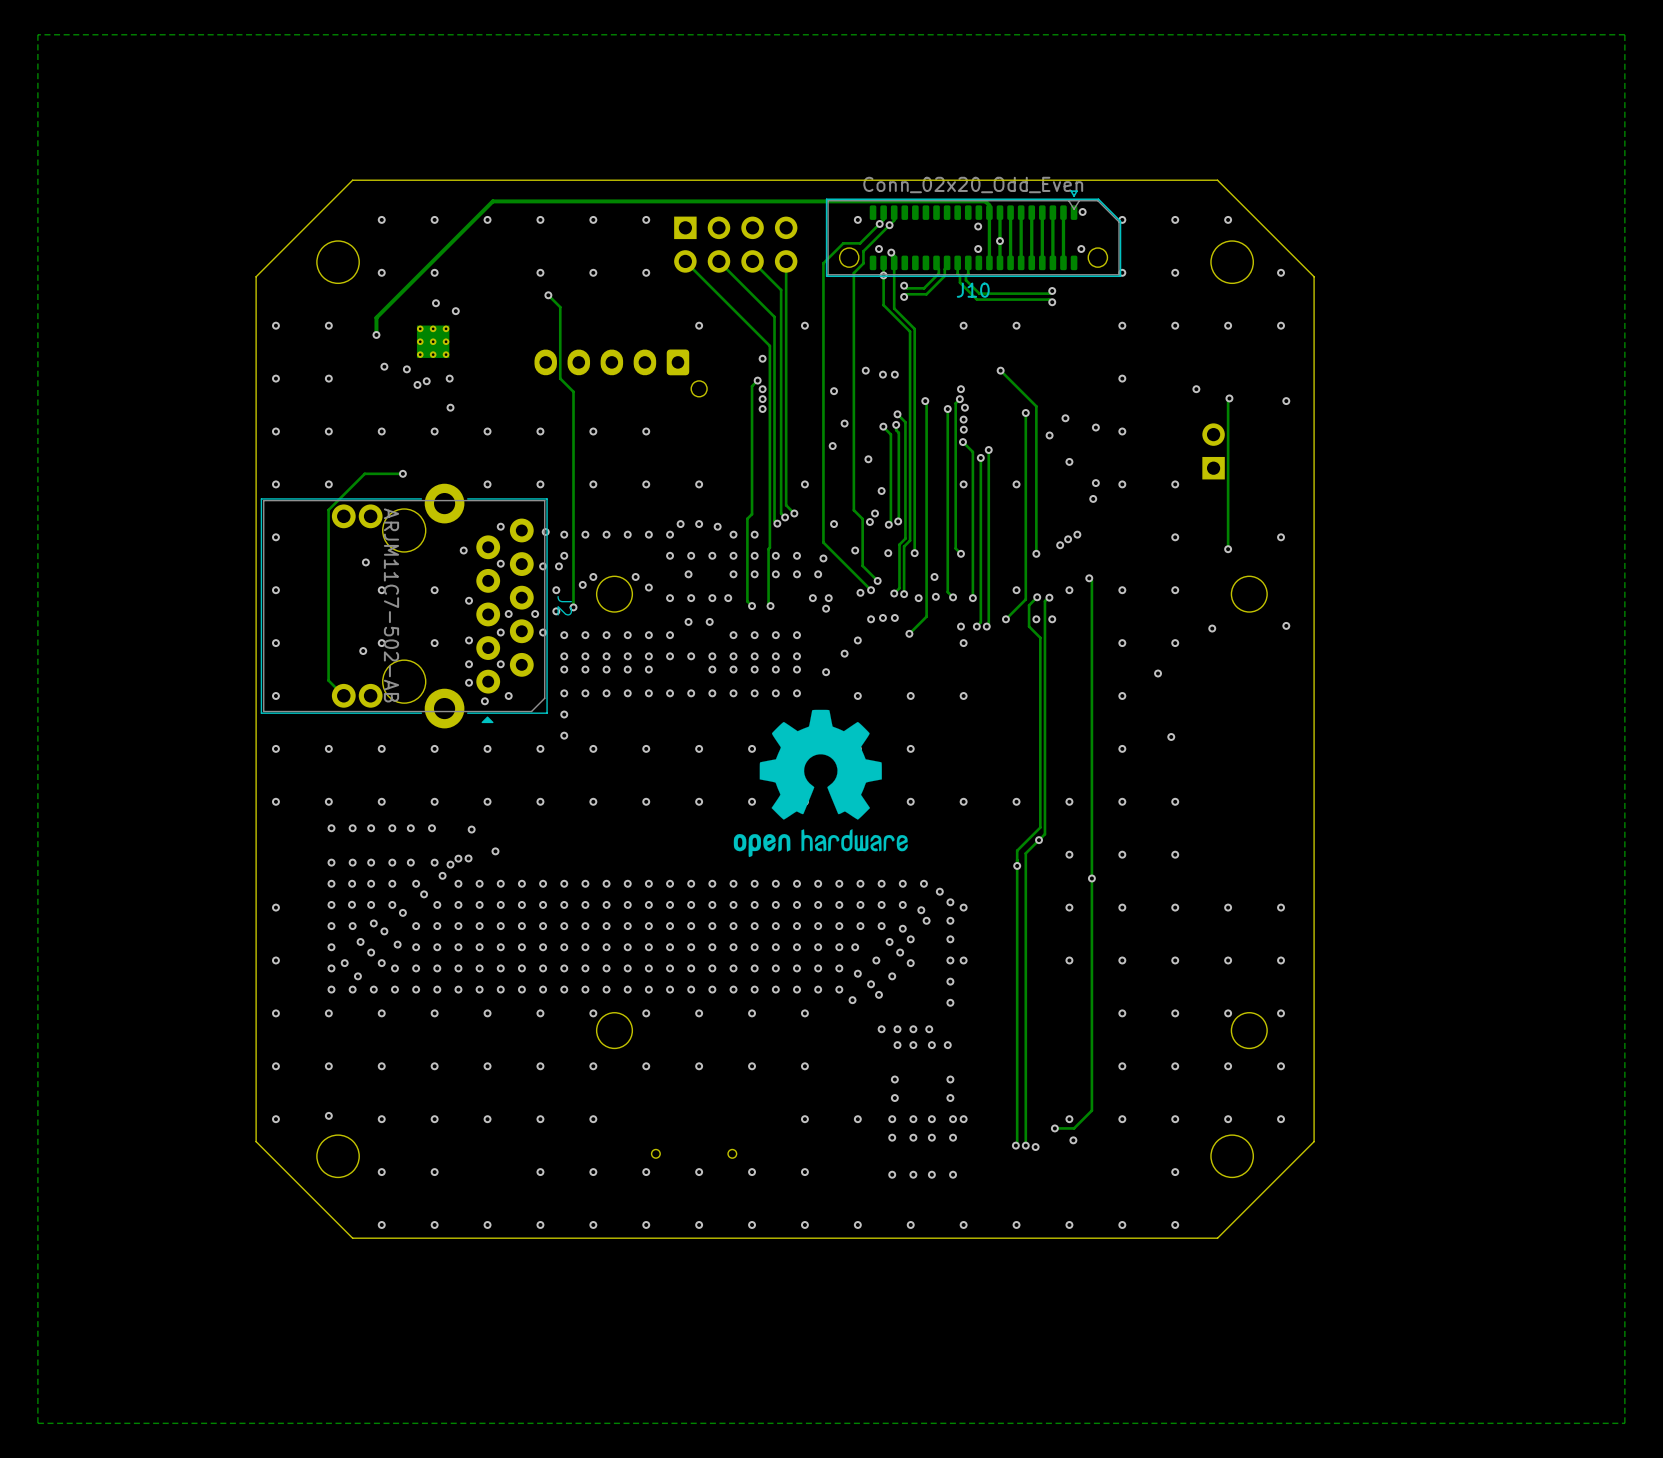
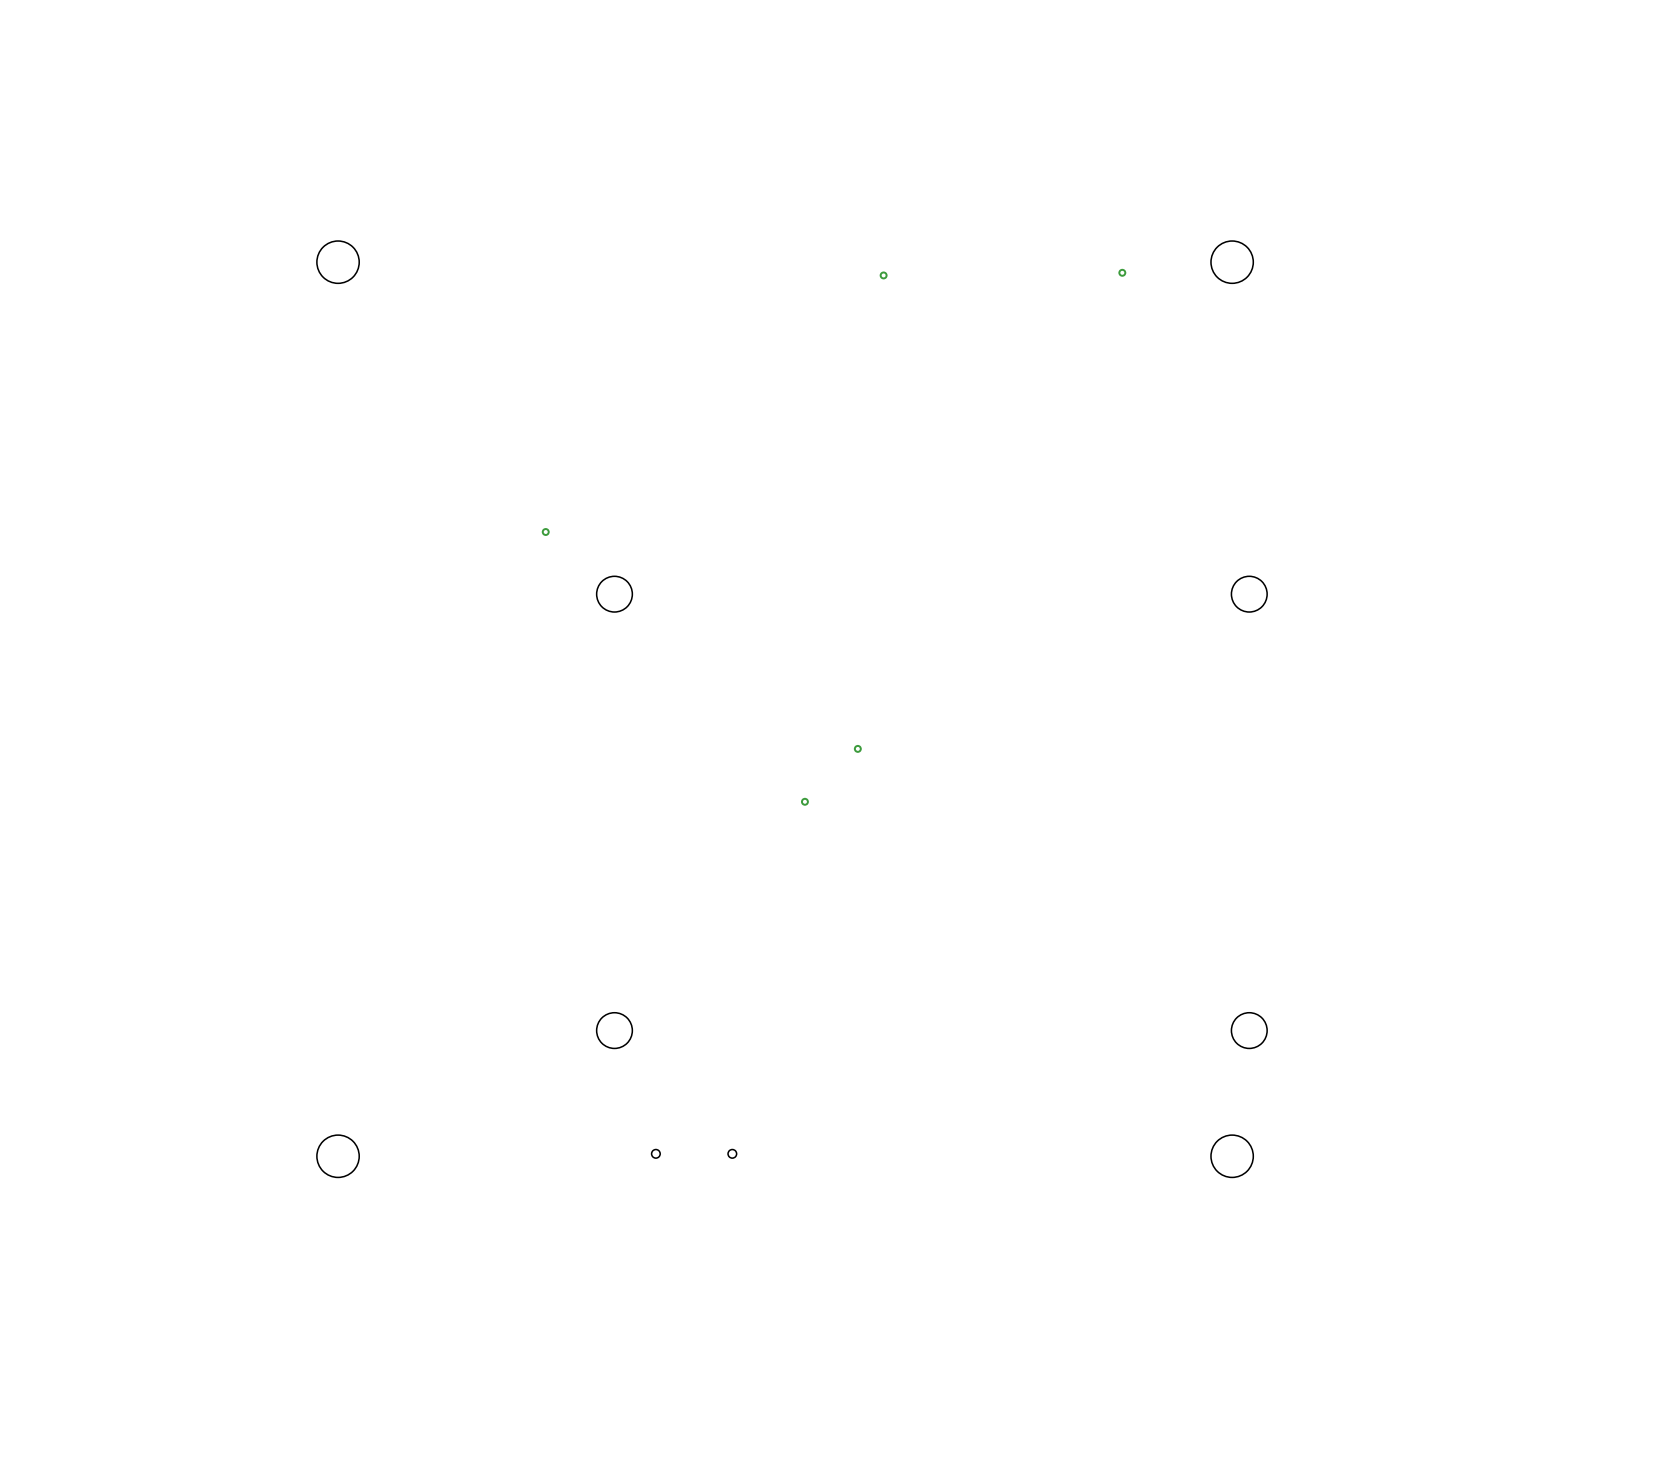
zone outline: (1624, 34) (37, 34) (37, 1423) (1624, 1423) (1624, 34) -> none
board edge: (1217, 180) (1314, 276) (1314, 1141) (1217, 1238) (352, 1238) (256, 1141) (256, 276) (352, 180) (1217, 180) -> none
via: (1082, 211) -> none
track: (883, 212) (883, 219) (860, 243) (843, 243) (823, 263) (823, 542) (871, 590) -> none
track: (894, 212) (894, 220) (863, 251) (863, 263) (853, 273) (853, 510) (862, 518) (862, 565) (877, 580) -> none
track: (999, 212) (999, 262) -> none
track: (1010, 212) (1010, 262) -> none
track: (1021, 212) (1021, 262) -> none
track: (1031, 212) (1031, 262) -> none
track: (1042, 212) (1042, 262) -> none
track: (1052, 212) (1052, 262) -> none
track: (1063, 212) (1063, 262) -> none
via: (381, 219) -> none
via: (434, 219) -> none
via: (487, 219) -> none
via: (540, 219) -> none
via: (593, 219) -> none
via: (646, 219) -> none
via: (857, 219) -> none
via: (1122, 219) -> none
via: (1175, 219) -> none
via: (1228, 219) -> none
via: (879, 223) -> none
via: (889, 225) -> none
via: (978, 226) -> none
J10: Conn_02x20_Odd_Even (973, 233) -> none
via: (999, 241) -> none
part: (735, 244) -> none
via: (878, 249) -> none
via: (978, 249) -> none
via: (1081, 249) -> none
track: (891, 252) (894, 255) (894, 308) (914, 329) (914, 553) -> none
via: (891, 252) -> none
track: (685, 261) (769, 345) (768, 604) (770, 606) -> none
track: (718, 261) (774, 316) (774, 520) (777, 523) -> none
track: (752, 261) (781, 289) (781, 513) (785, 517) -> none
track: (786, 261) (786, 505) (794, 513) -> none
track: (883, 262) (883, 305) (910, 331) (910, 540) (904, 546) (904, 594) -> none
track: (936, 262) (938, 273) (924, 288) (906, 288) (904, 285) -> none
track: (947, 262) (944, 276) (926, 294) (906, 294) (904, 296) -> none
track: (957, 262) (959, 282) (976, 299) (1049, 299) (1052, 302) -> none
track: (968, 262) (965, 280) (979, 293) (1049, 293) (1052, 290) -> none
track: (989, 262) (989, 205) (985, 201) (492, 201) (376, 317) (376, 334) -> none
via: (381, 272) -> none
via: (434, 272) -> none
via: (540, 272) -> none
via: (593, 272) -> none
via: (646, 272) -> none
via: (1175, 272) -> none
via: (1281, 272) -> none
via: (904, 285) -> none
via: (1052, 290) -> none
track: (548, 295) (560, 307) (560, 378) (573, 391) (573, 607) -> none
via: (548, 295) -> none
via: (904, 296) -> none
via: (1052, 302) -> none
via: (435, 303) -> none
via: (455, 311) -> none
via: (275, 325) -> none
via: (328, 325) -> none
via: (699, 325) -> none
via: (804, 325) -> none
via: (963, 325) -> none
via: (1016, 325) -> none
via: (1122, 325) -> none
via: (1175, 325) -> none
via: (1228, 325) -> none
via: (1281, 325) -> none
via: (376, 334) -> none
part: (433, 341) -> none
via: (762, 358) -> none
via: (384, 366) -> none
via: (406, 369) -> none
via: (865, 370) -> none
track: (1000, 370) (1036, 406) (1036, 553) -> none
via: (1000, 370) -> none
part: (620, 373) -> none
via: (882, 374) -> none
via: (894, 374) -> none
via: (275, 378) -> none
via: (328, 378) -> none
via: (449, 378) -> none
via: (1122, 378) -> none
track: (757, 380) (752, 386) (752, 514) (747, 518) (747, 601) (752, 606) -> none
via: (757, 380) -> none
via: (426, 381) -> none
via: (417, 384) -> none
via: (762, 389) -> none
via: (960, 389) -> none
via: (1196, 389) -> none
via: (834, 391) -> none
track: (1229, 398) (1228, 549) -> none
via: (1229, 398) -> none
via: (762, 399) -> none
track: (959, 399) (955, 403) (955, 548) (960, 553) -> none
via: (959, 399) -> none
track: (925, 401) (926, 616) (909, 633) -> none
via: (925, 401) -> none
via: (1286, 401) -> none
via: (450, 407) -> none
via: (964, 407) -> none
via: (762, 409) -> none
track: (947, 409) (947, 592) (953, 597) -> none
via: (947, 409) -> none
track: (1025, 412) (1025, 599) (1005, 619) -> none
via: (1025, 412) -> none
track: (897, 414) (905, 422) (905, 538) (899, 544) (899, 588) (894, 593) -> none
via: (897, 414) -> none
via: (1065, 418) -> none
via: (963, 419) -> none
via: (844, 423) -> none
track: (896, 424) (896, 430) (898, 432) (898, 521) -> none
via: (896, 424) -> none
track: (883, 426) (890, 434) (890, 522) (888, 524) -> none
via: (883, 426) -> none
via: (1095, 427) -> none
via: (963, 429) -> none
via: (275, 431) -> none
via: (328, 431) -> none
via: (381, 431) -> none
via: (434, 431) -> none
via: (487, 431) -> none
via: (540, 431) -> none
via: (593, 431) -> none
via: (646, 431) -> none
via: (1122, 431) -> none
via: (1049, 435) -> none
track: (962, 442) (972, 452) (972, 598) -> none
via: (962, 442) -> none
via: (832, 446) -> none
track: (988, 450) (988, 624) (986, 626) -> none
via: (988, 450) -> none
part: (1213, 451) -> none
track: (980, 457) (980, 622) (976, 626) -> none
via: (980, 457) -> none
via: (868, 459) -> none
via: (1069, 461) -> none
track: (402, 473) (364, 473) (328, 510) (328, 680) (343, 695) -> none
via: (402, 473) -> none
via: (1095, 483) -> none
via: (275, 484) -> none
via: (328, 484) -> none
via: (487, 484) -> none
via: (540, 484) -> none
via: (593, 484) -> none
via: (646, 484) -> none
via: (699, 484) -> none
via: (804, 484) -> none
via: (963, 484) -> none
via: (1016, 484) -> none
via: (1122, 484) -> none
via: (1175, 484) -> none
via: (881, 491) -> none
via: (1093, 498) -> none
via: (794, 513) -> none
via: (875, 513) -> none
via: (785, 517) -> none
via: (898, 521) -> none
via: (869, 522) -> none
via: (777, 523) -> none
via: (680, 524) -> none
via: (699, 524) -> none
via: (834, 524) -> none
via: (888, 524) -> none
via: (500, 526) -> none
via: (717, 526) -> none
via: (564, 534) -> none
via: (585, 534) -> none
via: (606, 534) -> none
via: (627, 534) -> none
via: (648, 534) -> none
via: (670, 534) -> none
via: (733, 534) -> none
via: (754, 534) -> none
via: (1077, 534) -> none
via: (275, 537) -> none
via: (1175, 537) -> none
via: (1281, 537) -> none
via: (1068, 539) -> none
via: (1060, 545) -> none
via: (1228, 549) -> none
via: (463, 550) -> none
via: (855, 550) -> none
via: (888, 553) -> none
via: (914, 553) -> none
via: (960, 553) -> none
via: (1036, 553) -> none
via: (564, 555) -> none
via: (670, 555) -> none
via: (691, 555) -> none
via: (712, 555) -> none
via: (733, 555) -> none
via: (754, 555) -> none
via: (775, 555) -> none
via: (797, 555) -> none
via: (823, 558) -> none
via: (365, 562) -> none
via: (500, 563) -> none
via: (543, 566) -> none
via: (558, 566) -> none
via: (688, 574) -> none
via: (733, 574) -> none
via: (754, 574) -> none
via: (775, 574) -> none
via: (797, 574) -> none
via: (818, 574) -> none
via: (593, 576) -> none
via: (635, 576) -> none
via: (934, 576) -> none
track: (1089, 578) (1091, 580) (1091, 1110) (1074, 1128) (1054, 1128) -> none
via: (1089, 578) -> none
via: (877, 580) -> none
via: (582, 584) -> none
via: (648, 587) -> none
via: (275, 590) -> none
via: (381, 590) -> none
via: (434, 590) -> none
via: (556, 590) -> none
via: (871, 590) -> none
via: (1016, 590) -> none
via: (1069, 590) -> none
via: (1122, 590) -> none
via: (1175, 590) -> none
via: (860, 592) -> none
via: (894, 593) -> none
via: (904, 594) -> none
via: (935, 596) -> none
via: (953, 597) -> none
track: (1037, 597) (1029, 605) (1029, 626) (1040, 637) (1040, 827) (1017, 850) (1015, 1145) -> none
via: (1037, 597) -> none
track: (1049, 597) (1044, 601) (1044, 834) (1025, 853) (1025, 1145) -> none
via: (1049, 597) -> none
via: (670, 598) -> none
via: (691, 598) -> none
via: (712, 598) -> none
via: (728, 598) -> none
via: (812, 598) -> none
via: (828, 598) -> none
via: (918, 598) -> none
via: (972, 598) -> none
via: (469, 600) -> none
J2: ARJM11C7-502-AB (404, 606) -> none
via: (752, 606) -> none
via: (770, 606) -> none
via: (573, 607) -> none
via: (826, 608) -> none
via: (556, 611) -> none
via: (508, 614) -> none
via: (535, 614) -> none
via: (882, 617) -> none
via: (894, 617) -> none
via: (871, 619) -> none
via: (1005, 619) -> none
via: (1036, 619) -> none
via: (1052, 619) -> none
via: (688, 621) -> none
via: (709, 621) -> none
via: (1286, 625) -> none
via: (960, 626) -> none
via: (976, 626) -> none
via: (986, 626) -> none
via: (1212, 628) -> none
via: (500, 632) -> none
via: (543, 632) -> none
via: (909, 633) -> none
via: (564, 635) -> none
via: (585, 635) -> none
via: (606, 635) -> none
via: (627, 635) -> none
via: (648, 635) -> none
via: (670, 635) -> none
via: (733, 635) -> none
via: (754, 635) -> none
via: (775, 635) -> none
via: (797, 635) -> none
via: (469, 640) -> none
via: (857, 640) -> none
via: (275, 643) -> none
via: (381, 643) -> none
via: (434, 643) -> none
via: (963, 643) -> none
via: (1122, 643) -> none
via: (1175, 643) -> none
via: (363, 651) -> none
via: (844, 653) -> none
via: (564, 656) -> none
via: (585, 656) -> none
via: (606, 656) -> none
via: (627, 656) -> none
via: (648, 656) -> none
via: (670, 656) -> none
via: (691, 656) -> none
via: (712, 656) -> none
via: (733, 656) -> none
via: (754, 656) -> none
via: (775, 656) -> none
via: (797, 656) -> none
via: (469, 664) -> none
via: (500, 664) -> none
via: (564, 669) -> none
via: (585, 669) -> none
via: (606, 669) -> none
via: (627, 669) -> none
via: (648, 669) -> none
via: (712, 669) -> none
via: (733, 669) -> none
via: (754, 669) -> none
via: (775, 669) -> none
via: (797, 669) -> none
via: (826, 672) -> none
via: (1158, 673) -> none
via: (469, 682) -> none
via: (564, 693) -> none
via: (585, 693) -> none
via: (606, 693) -> none
via: (627, 693) -> none
via: (648, 693) -> none
via: (670, 693) -> none
via: (691, 693) -> none
via: (712, 693) -> none
via: (733, 693) -> none
via: (754, 693) -> none
via: (775, 693) -> none
via: (797, 693) -> none
via: (275, 695) -> none
via: (508, 695) -> none
via: (857, 695) -> none
via: (910, 695) -> none
via: (963, 695) -> none
via: (1122, 695) -> none
via: (484, 701) -> none
drawing: [733, 709, 908, 858] -> none
via: (564, 714) -> none
via: (564, 735) -> none
via: (1171, 736) -> none
via: (275, 748) -> none
via: (328, 748) -> none
via: (381, 748) -> none
via: (434, 748) -> none
via: (487, 748) -> none
via: (540, 748) -> none
via: (593, 748) -> none
via: (646, 748) -> none
via: (699, 748) -> none
via: (752, 748) -> none
via: (910, 748) -> none
via: (1122, 748) -> none
via: (275, 801) -> none
via: (328, 801) -> none
via: (381, 801) -> none
via: (434, 801) -> none
via: (487, 801) -> none
via: (540, 801) -> none
via: (593, 801) -> none
via: (646, 801) -> none
via: (699, 801) -> none
via: (752, 801) -> none
via: (910, 801) -> none
via: (963, 801) -> none
via: (1016, 801) -> none
via: (1069, 801) -> none
via: (1122, 801) -> none
via: (1175, 801) -> none
via: (331, 828) -> none
via: (352, 828) -> none
via: (371, 828) -> none
via: (392, 828) -> none
via: (410, 828) -> none
via: (432, 828) -> none
via: (471, 829) -> none
via: (1039, 840) -> none
via: (495, 851) -> none
via: (1069, 854) -> none
via: (1122, 854) -> none
via: (1175, 854) -> none
via: (458, 858) -> none
via: (468, 858) -> none
via: (331, 862) -> none
via: (352, 862) -> none
via: (371, 862) -> none
via: (392, 862) -> none
via: (410, 862) -> none
via: (434, 862) -> none
via: (450, 864) -> none
via: (1017, 865) -> none
via: (442, 875) -> none
via: (1091, 878) -> none
via: (331, 883) -> none
via: (352, 883) -> none
via: (371, 883) -> none
via: (392, 883) -> none
via: (416, 883) -> none
via: (458, 883) -> none
via: (479, 883) -> none
via: (500, 883) -> none
via: (521, 883) -> none
via: (543, 883) -> none
via: (564, 883) -> none
via: (585, 883) -> none
via: (606, 883) -> none
via: (627, 883) -> none
via: (648, 883) -> none
via: (670, 883) -> none
via: (691, 883) -> none
via: (712, 883) -> none
via: (733, 883) -> none
via: (754, 883) -> none
via: (775, 883) -> none
via: (797, 883) -> none
via: (818, 883) -> none
via: (839, 883) -> none
via: (860, 883) -> none
via: (881, 883) -> none
via: (902, 883) -> none
via: (923, 883) -> none
via: (939, 891) -> none
via: (424, 894) -> none
via: (950, 902) -> none
via: (331, 904) -> none
via: (351, 904) -> none
via: (371, 904) -> none
via: (392, 904) -> none
via: (437, 904) -> none
via: (458, 904) -> none
via: (479, 904) -> none
via: (500, 904) -> none
via: (521, 904) -> none
via: (543, 904) -> none
via: (564, 904) -> none
via: (585, 904) -> none
via: (606, 904) -> none
via: (627, 904) -> none
via: (648, 904) -> none
via: (670, 904) -> none
via: (691, 904) -> none
via: (712, 904) -> none
via: (733, 904) -> none
via: (754, 904) -> none
via: (775, 904) -> none
via: (797, 904) -> none
via: (818, 904) -> none
via: (839, 904) -> none
via: (860, 904) -> none
via: (881, 904) -> none
via: (902, 904) -> none
via: (275, 907) -> none
via: (963, 907) -> none
via: (1069, 907) -> none
via: (1122, 907) -> none
via: (1175, 907) -> none
via: (1228, 907) -> none
via: (1281, 907) -> none
via: (921, 910) -> none
via: (402, 912) -> none
via: (926, 920) -> none
via: (950, 920) -> none
via: (373, 923) -> none
via: (331, 926) -> none
via: (352, 926) -> none
via: (416, 926) -> none
via: (437, 926) -> none
via: (458, 926) -> none
via: (479, 926) -> none
via: (500, 926) -> none
via: (521, 926) -> none
via: (543, 926) -> none
via: (564, 926) -> none
via: (585, 926) -> none
via: (606, 926) -> none
via: (627, 926) -> none
via: (648, 926) -> none
via: (670, 926) -> none
via: (691, 926) -> none
via: (712, 926) -> none
via: (733, 926) -> none
via: (754, 926) -> none
via: (775, 926) -> none
via: (797, 926) -> none
via: (818, 926) -> none
via: (839, 926) -> none
via: (860, 926) -> none
via: (881, 926) -> none
via: (902, 928) -> none
via: (384, 931) -> none
via: (910, 939) -> none
via: (950, 939) -> none
via: (360, 941) -> none
via: (889, 941) -> none
via: (397, 944) -> none
via: (331, 947) -> none
via: (416, 947) -> none
via: (437, 947) -> none
via: (458, 947) -> none
via: (479, 947) -> none
via: (500, 947) -> none
via: (521, 947) -> none
via: (543, 947) -> none
via: (564, 947) -> none
via: (585, 947) -> none
via: (606, 947) -> none
via: (627, 947) -> none
via: (648, 947) -> none
via: (670, 947) -> none
via: (691, 947) -> none
via: (712, 947) -> none
via: (733, 947) -> none
via: (754, 947) -> none
via: (775, 947) -> none
via: (797, 947) -> none
via: (818, 947) -> none
via: (839, 947) -> none
via: (855, 947) -> none
via: (371, 952) -> none
via: (900, 952) -> none
via: (275, 960) -> none
via: (876, 960) -> none
via: (950, 960) -> none
via: (963, 960) -> none
via: (1069, 960) -> none
via: (1122, 960) -> none
via: (1175, 960) -> none
via: (1228, 960) -> none
via: (1281, 960) -> none
via: (344, 963) -> none
via: (381, 963) -> none
via: (910, 963) -> none
via: (331, 968) -> none
via: (394, 968) -> none
via: (416, 968) -> none
via: (437, 968) -> none
via: (458, 968) -> none
via: (479, 968) -> none
via: (500, 968) -> none
via: (521, 968) -> none
via: (543, 968) -> none
via: (564, 968) -> none
via: (585, 968) -> none
via: (606, 968) -> none
via: (627, 968) -> none
via: (648, 968) -> none
via: (670, 968) -> none
via: (691, 968) -> none
via: (712, 968) -> none
via: (733, 968) -> none
via: (754, 968) -> none
via: (775, 968) -> none
via: (797, 968) -> none
via: (818, 968) -> none
via: (839, 968) -> none
via: (857, 973) -> none
via: (357, 976) -> none
via: (892, 976) -> none
via: (950, 981) -> none
via: (871, 984) -> none
via: (331, 989) -> none
via: (352, 989) -> none
via: (373, 989) -> none
via: (394, 989) -> none
via: (416, 989) -> none
via: (437, 989) -> none
via: (458, 989) -> none
via: (479, 989) -> none
via: (500, 989) -> none
via: (521, 989) -> none
via: (543, 989) -> none
via: (564, 989) -> none
via: (585, 989) -> none
via: (606, 989) -> none
via: (627, 989) -> none
via: (648, 989) -> none
via: (670, 989) -> none
via: (691, 989) -> none
via: (712, 989) -> none
via: (733, 989) -> none
via: (754, 989) -> none
via: (775, 989) -> none
via: (797, 989) -> none
via: (818, 989) -> none
via: (839, 989) -> none
via: (878, 994) -> none
via: (852, 1000) -> none
via: (950, 1002) -> none
via: (275, 1013) -> none
via: (328, 1013) -> none
via: (381, 1013) -> none
via: (434, 1013) -> none
via: (487, 1013) -> none
via: (540, 1013) -> none
via: (593, 1013) -> none
via: (646, 1013) -> none
via: (699, 1013) -> none
via: (752, 1013) -> none
via: (804, 1013) -> none
via: (1122, 1013) -> none
via: (1175, 1013) -> none
via: (1228, 1013) -> none
via: (1281, 1013) -> none
via: (881, 1029) -> none
via: (897, 1029) -> none
via: (913, 1029) -> none
via: (929, 1029) -> none
via: (897, 1045) -> none
via: (913, 1045) -> none
via: (931, 1045) -> none
via: (947, 1045) -> none
via: (275, 1066) -> none
via: (328, 1066) -> none
via: (381, 1066) -> none
via: (434, 1066) -> none
via: (487, 1066) -> none
via: (540, 1066) -> none
via: (593, 1066) -> none
via: (646, 1066) -> none
via: (699, 1066) -> none
via: (752, 1066) -> none
via: (804, 1066) -> none
via: (1122, 1066) -> none
via: (1175, 1066) -> none
via: (1228, 1066) -> none
via: (1281, 1066) -> none
via: (894, 1079) -> none
via: (950, 1079) -> none
via: (894, 1098) -> none
via: (950, 1098) -> none
via: (328, 1115) -> none
via: (275, 1119) -> none
via: (381, 1119) -> none
via: (434, 1119) -> none
via: (487, 1119) -> none
via: (540, 1119) -> none
via: (593, 1119) -> none
via: (804, 1119) -> none
via: (857, 1119) -> none
via: (892, 1119) -> none
via: (913, 1119) -> none
via: (931, 1119) -> none
via: (953, 1119) -> none
via: (963, 1119) -> none
via: (1069, 1119) -> none
via: (1122, 1119) -> none
via: (1175, 1119) -> none
via: (1228, 1119) -> none
via: (1281, 1119) -> none
via: (1054, 1128) -> none
via: (892, 1137) -> none
via: (913, 1137) -> none
via: (931, 1137) -> none
via: (953, 1137) -> none
via: (1073, 1140) -> none
via: (1015, 1145) -> none
via: (1025, 1145) -> none
via: (1035, 1147) -> none
via: (381, 1172) -> none
via: (434, 1172) -> none
via: (540, 1172) -> none
via: (593, 1172) -> none
via: (646, 1172) -> none
via: (699, 1172) -> none
via: (752, 1172) -> none
via: (804, 1172) -> none
via: (1175, 1172) -> none
via: (892, 1174) -> none
via: (913, 1174) -> none
via: (931, 1174) -> none
via: (953, 1174) -> none
via: (381, 1224) -> none
via: (434, 1224) -> none
via: (487, 1224) -> none
via: (540, 1224) -> none
via: (593, 1224) -> none
via: (646, 1224) -> none
via: (699, 1224) -> none
via: (752, 1224) -> none
via: (804, 1224) -> none
via: (857, 1224) -> none
via: (910, 1224) -> none
via: (963, 1224) -> none
via: (1016, 1224) -> none
via: (1069, 1224) -> none
via: (1122, 1224) -> none
via: (1175, 1224) -> none

